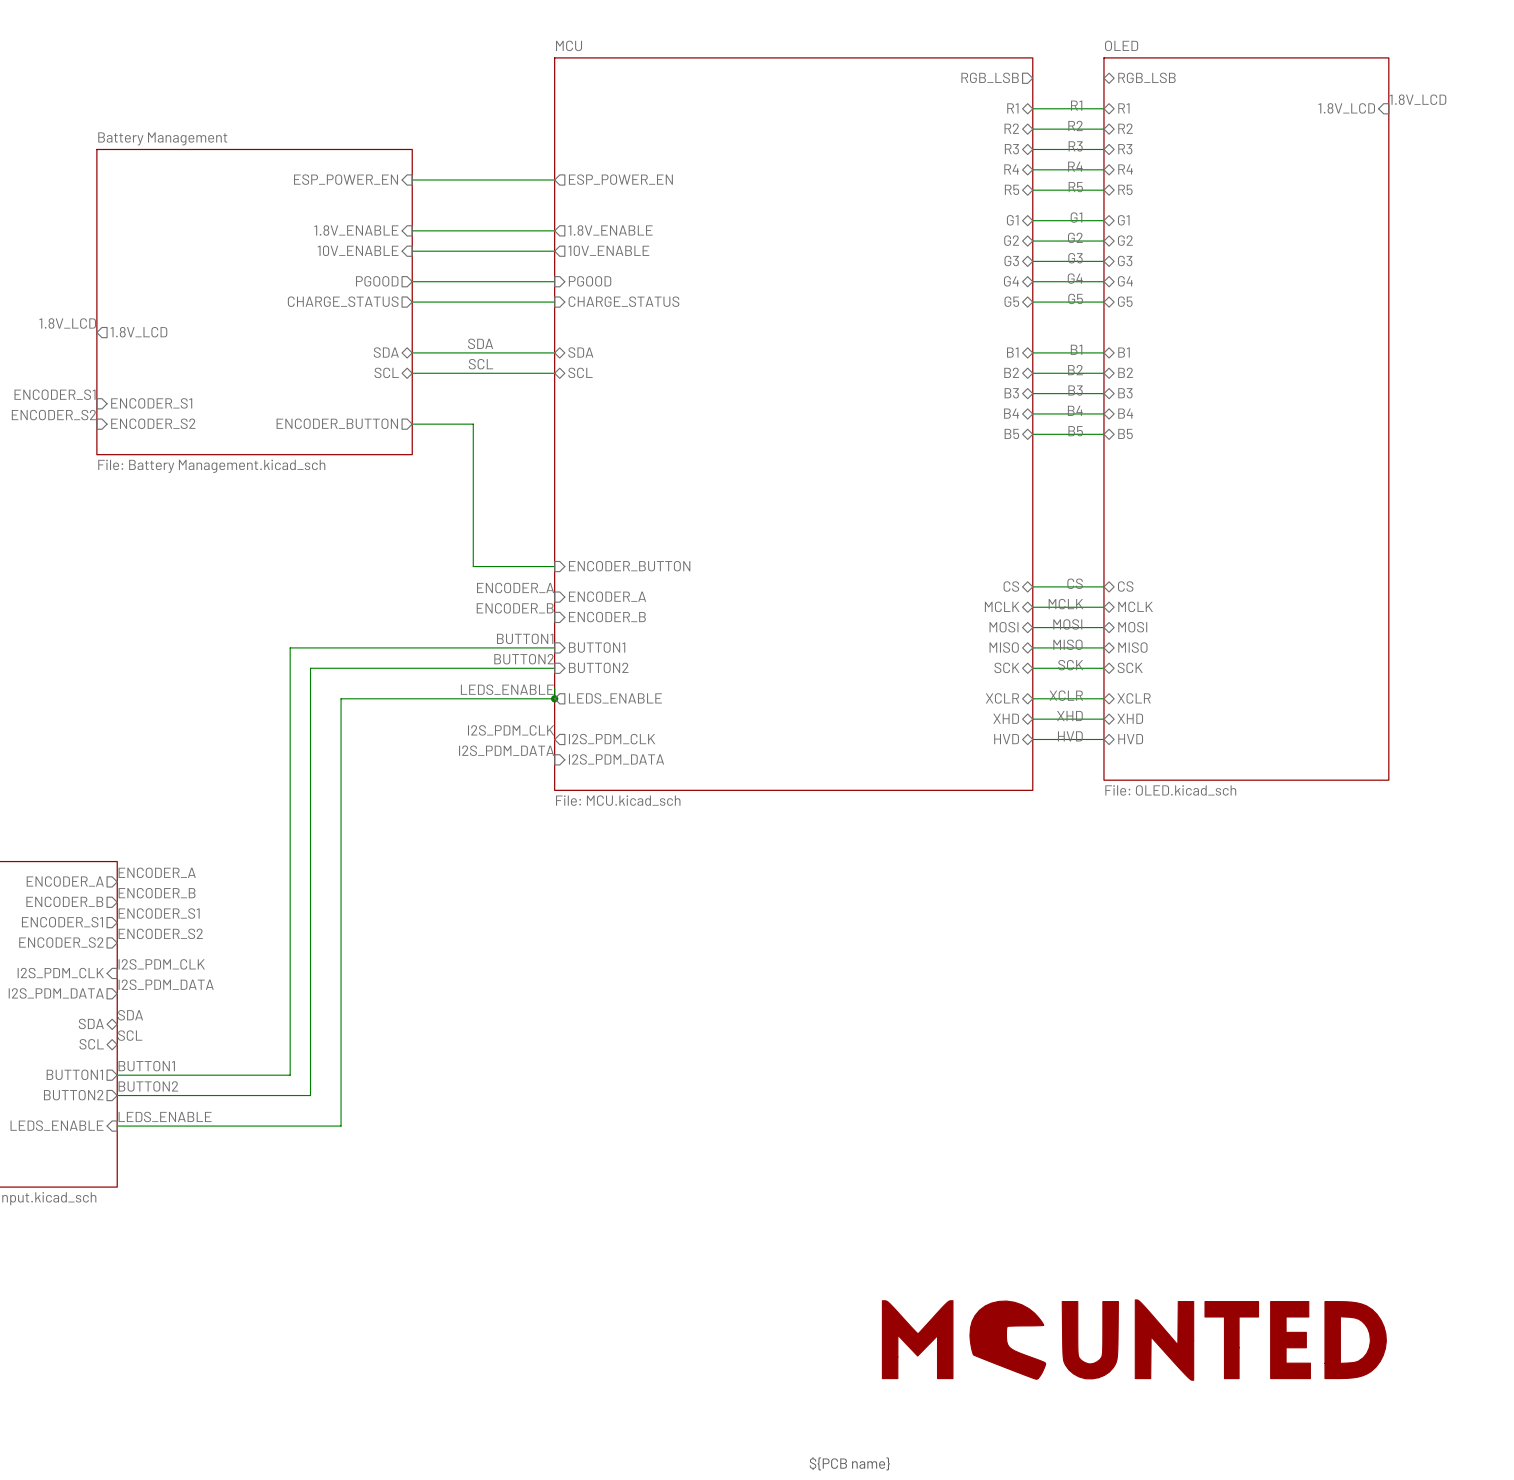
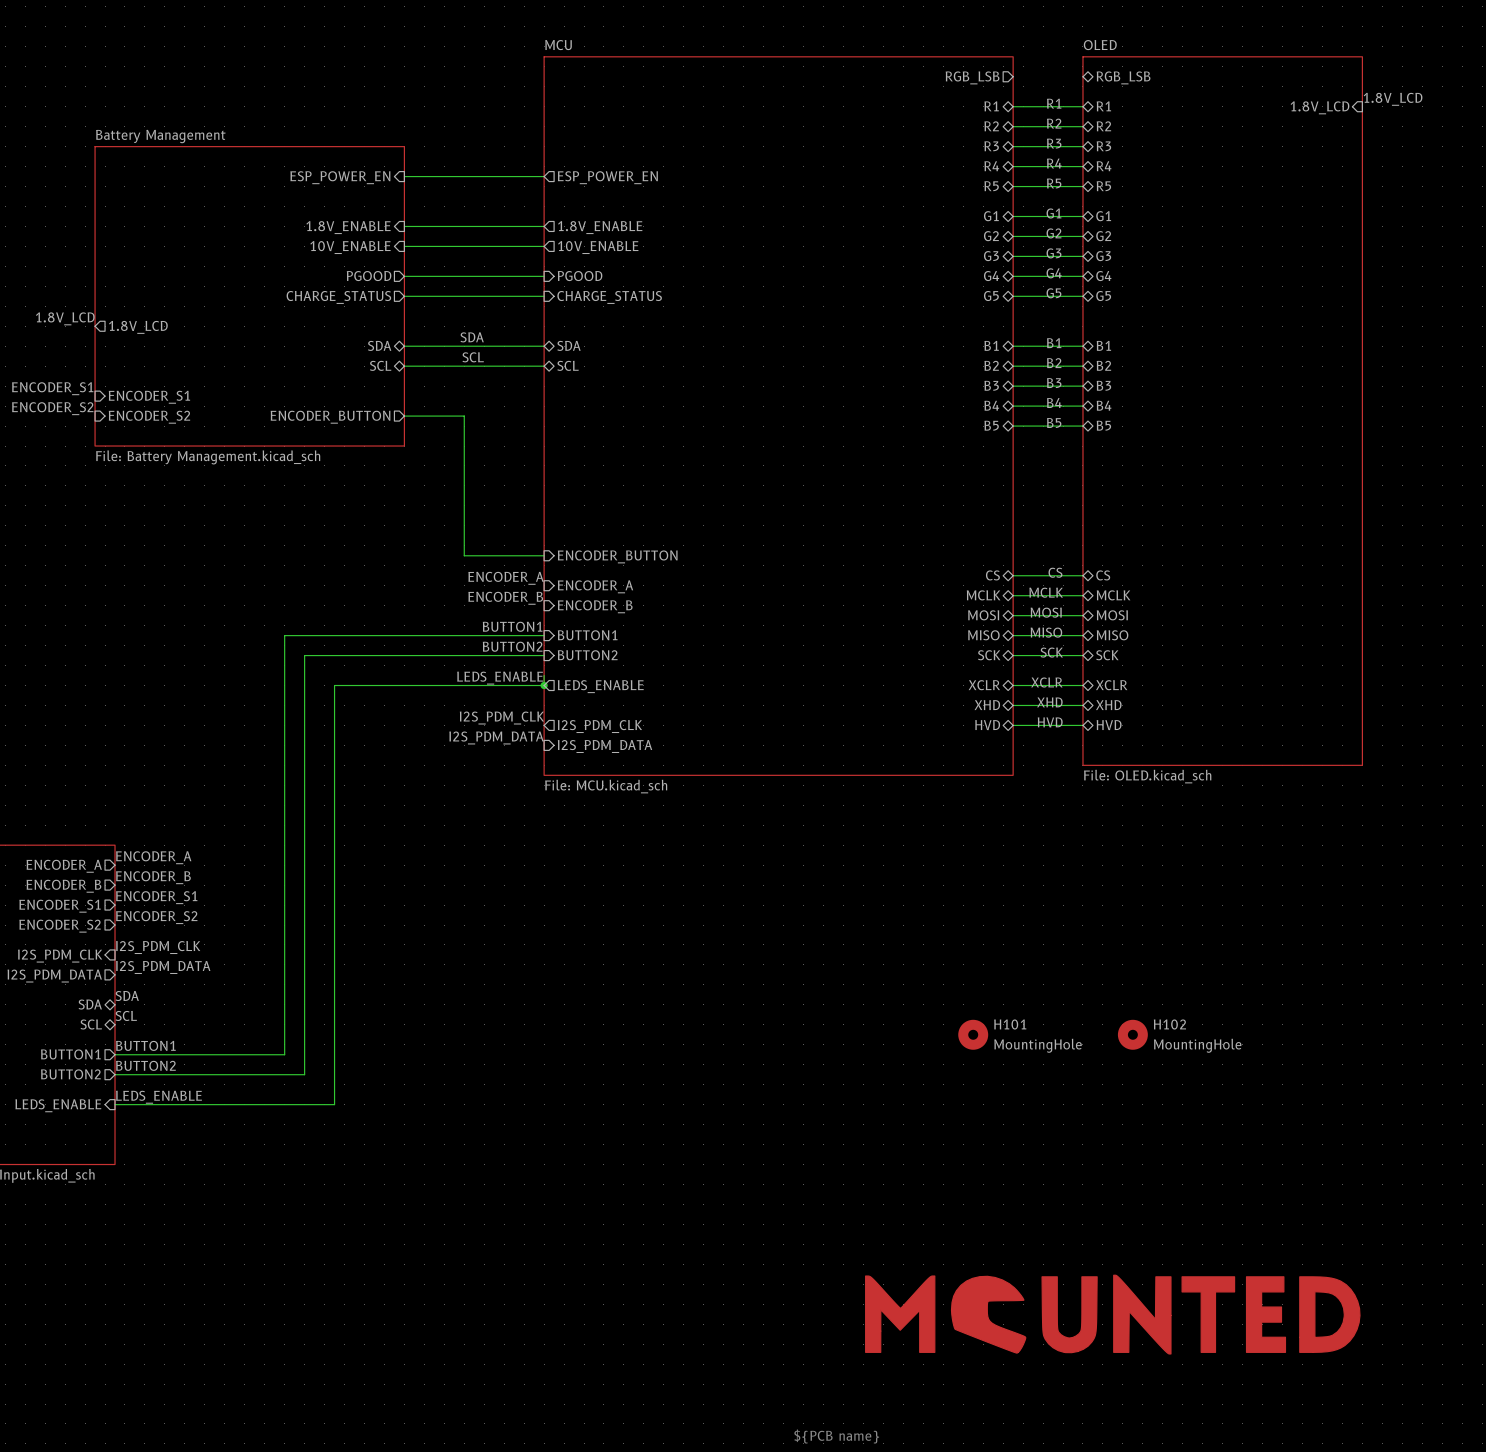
H101: none -> MountingHole (973, 1034)
H102: none -> MountingHole (1132, 1034)

